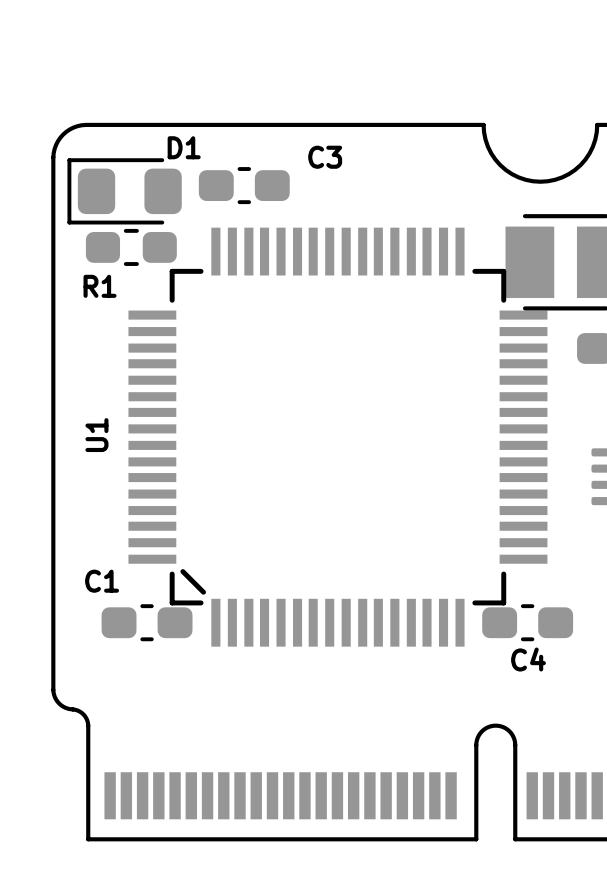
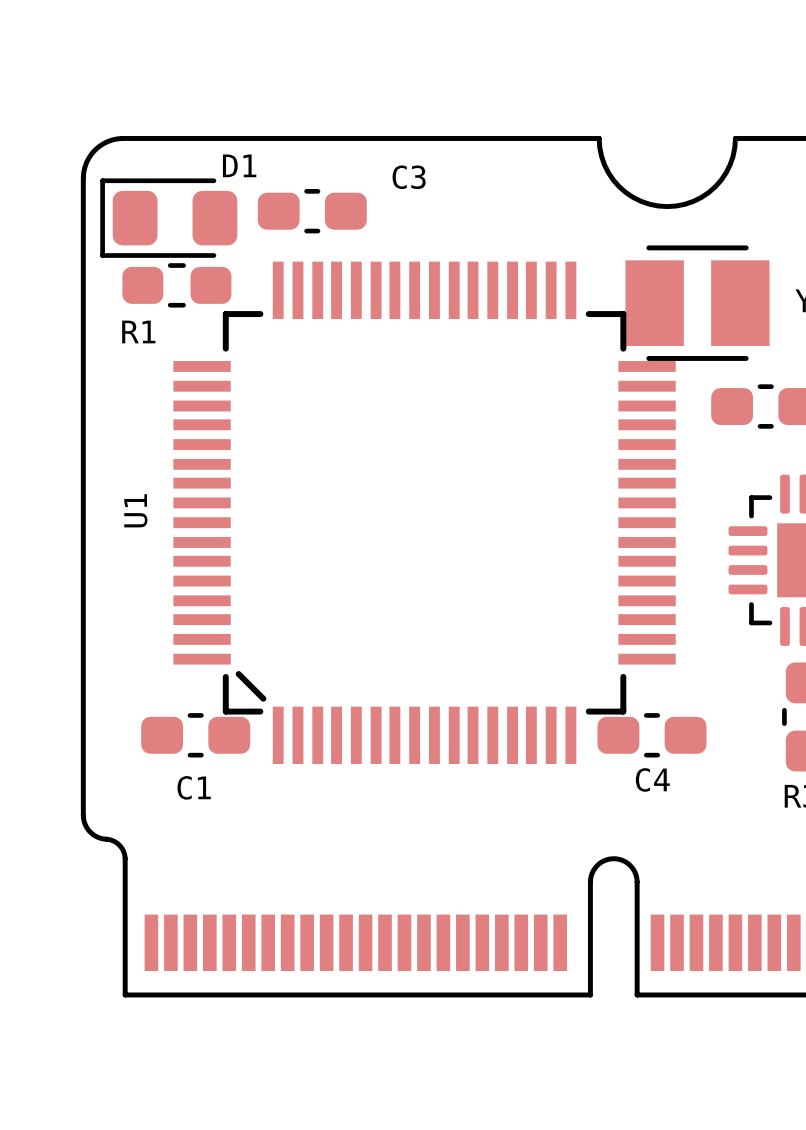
C1 name position: C1 (102, 581) -> C1 (194, 787)

